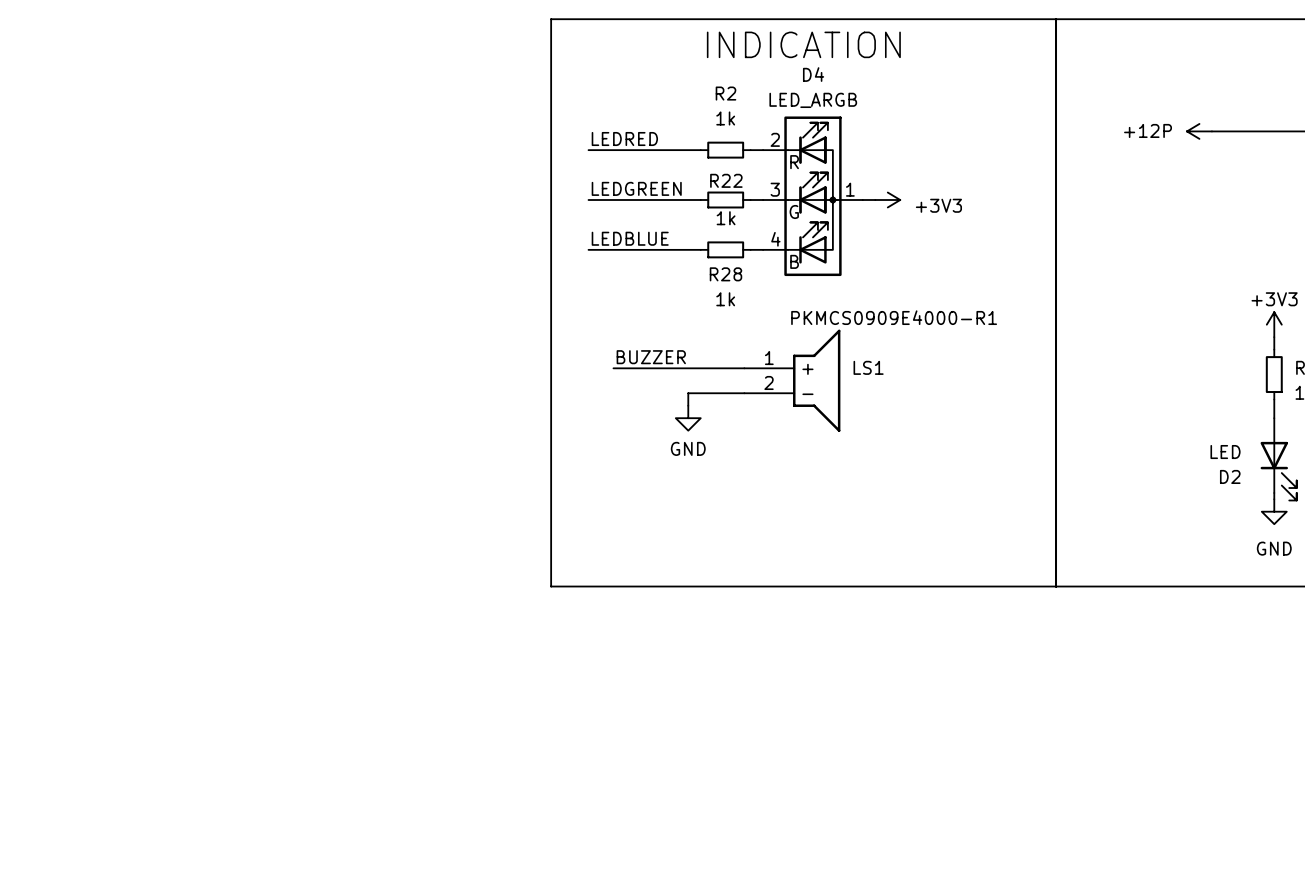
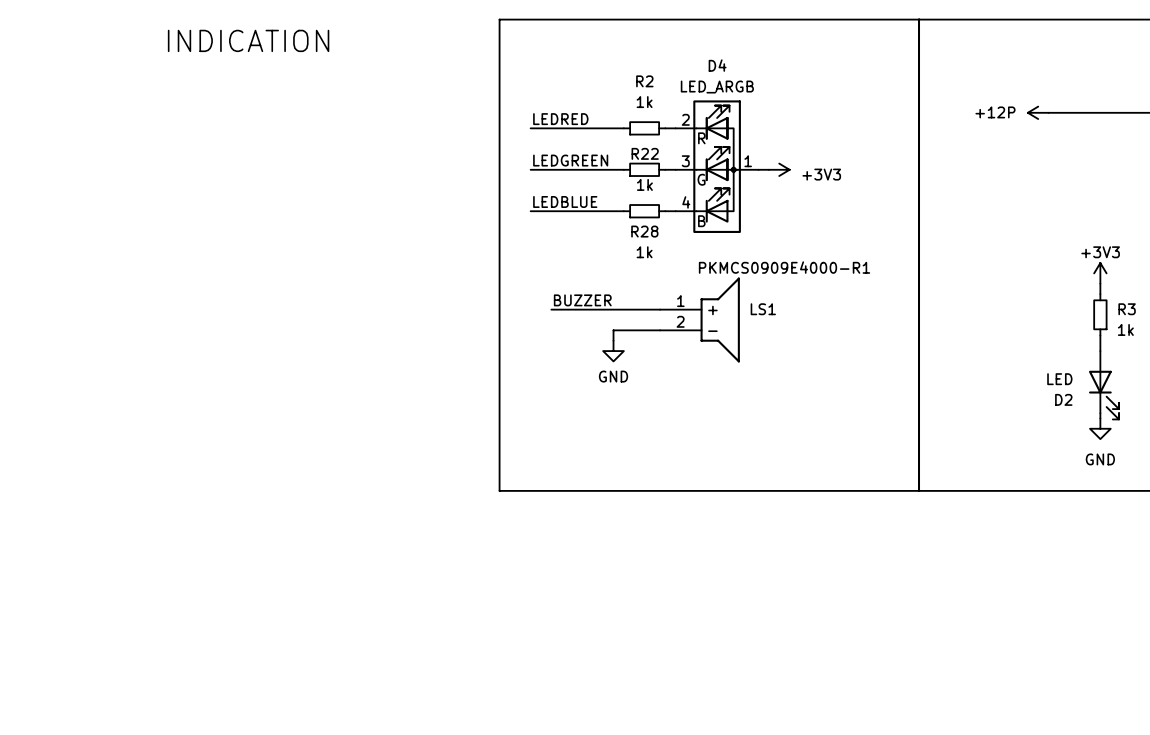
text: none -> INDICATION (248, 40)
text: INDICATION (803, 44) -> none

